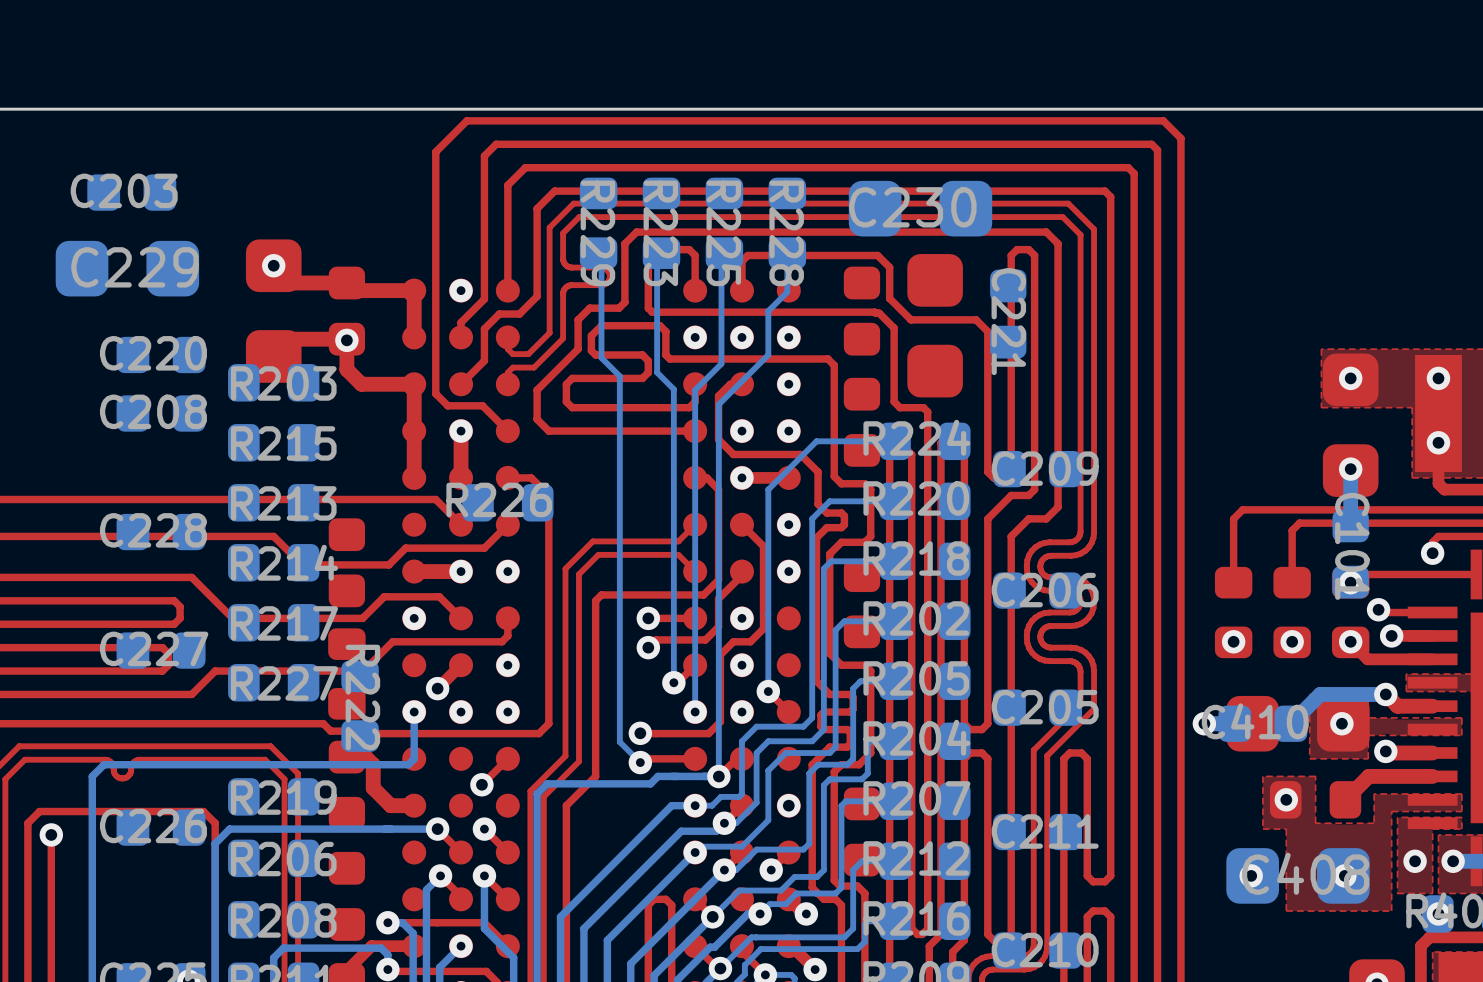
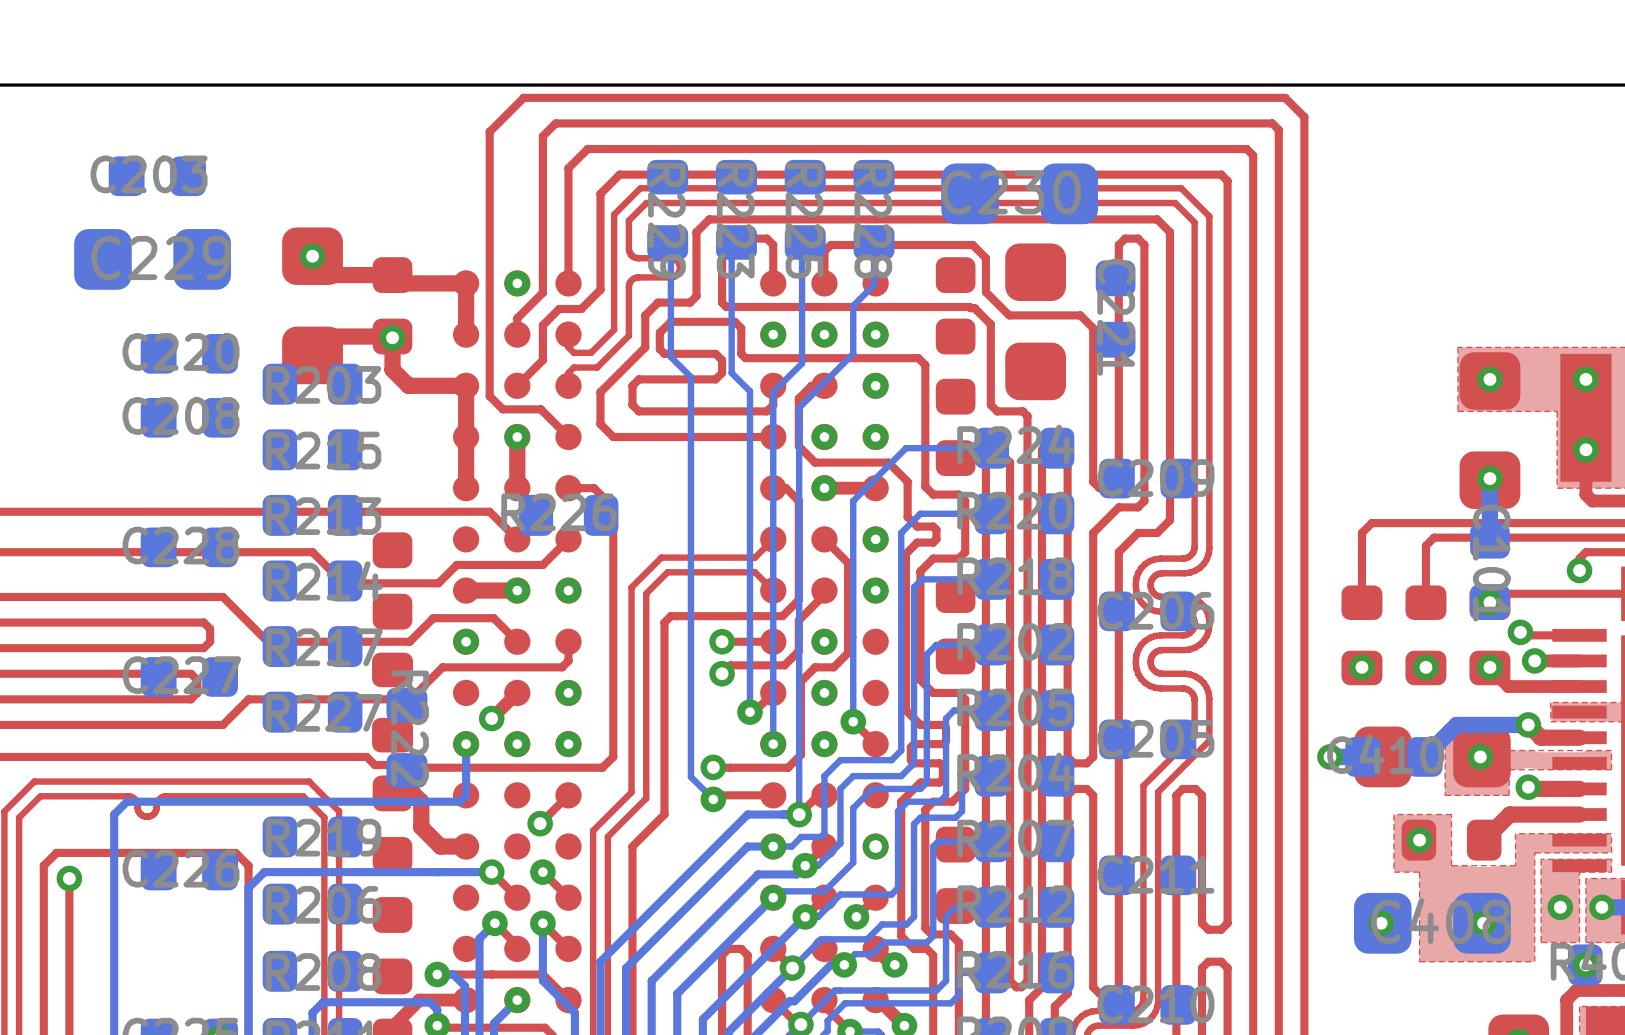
bottom track: (671, 776) (657, 776) (650, 783) (547, 783) (537, 793) (537, 911) -> (747, 814) (600, 961)

